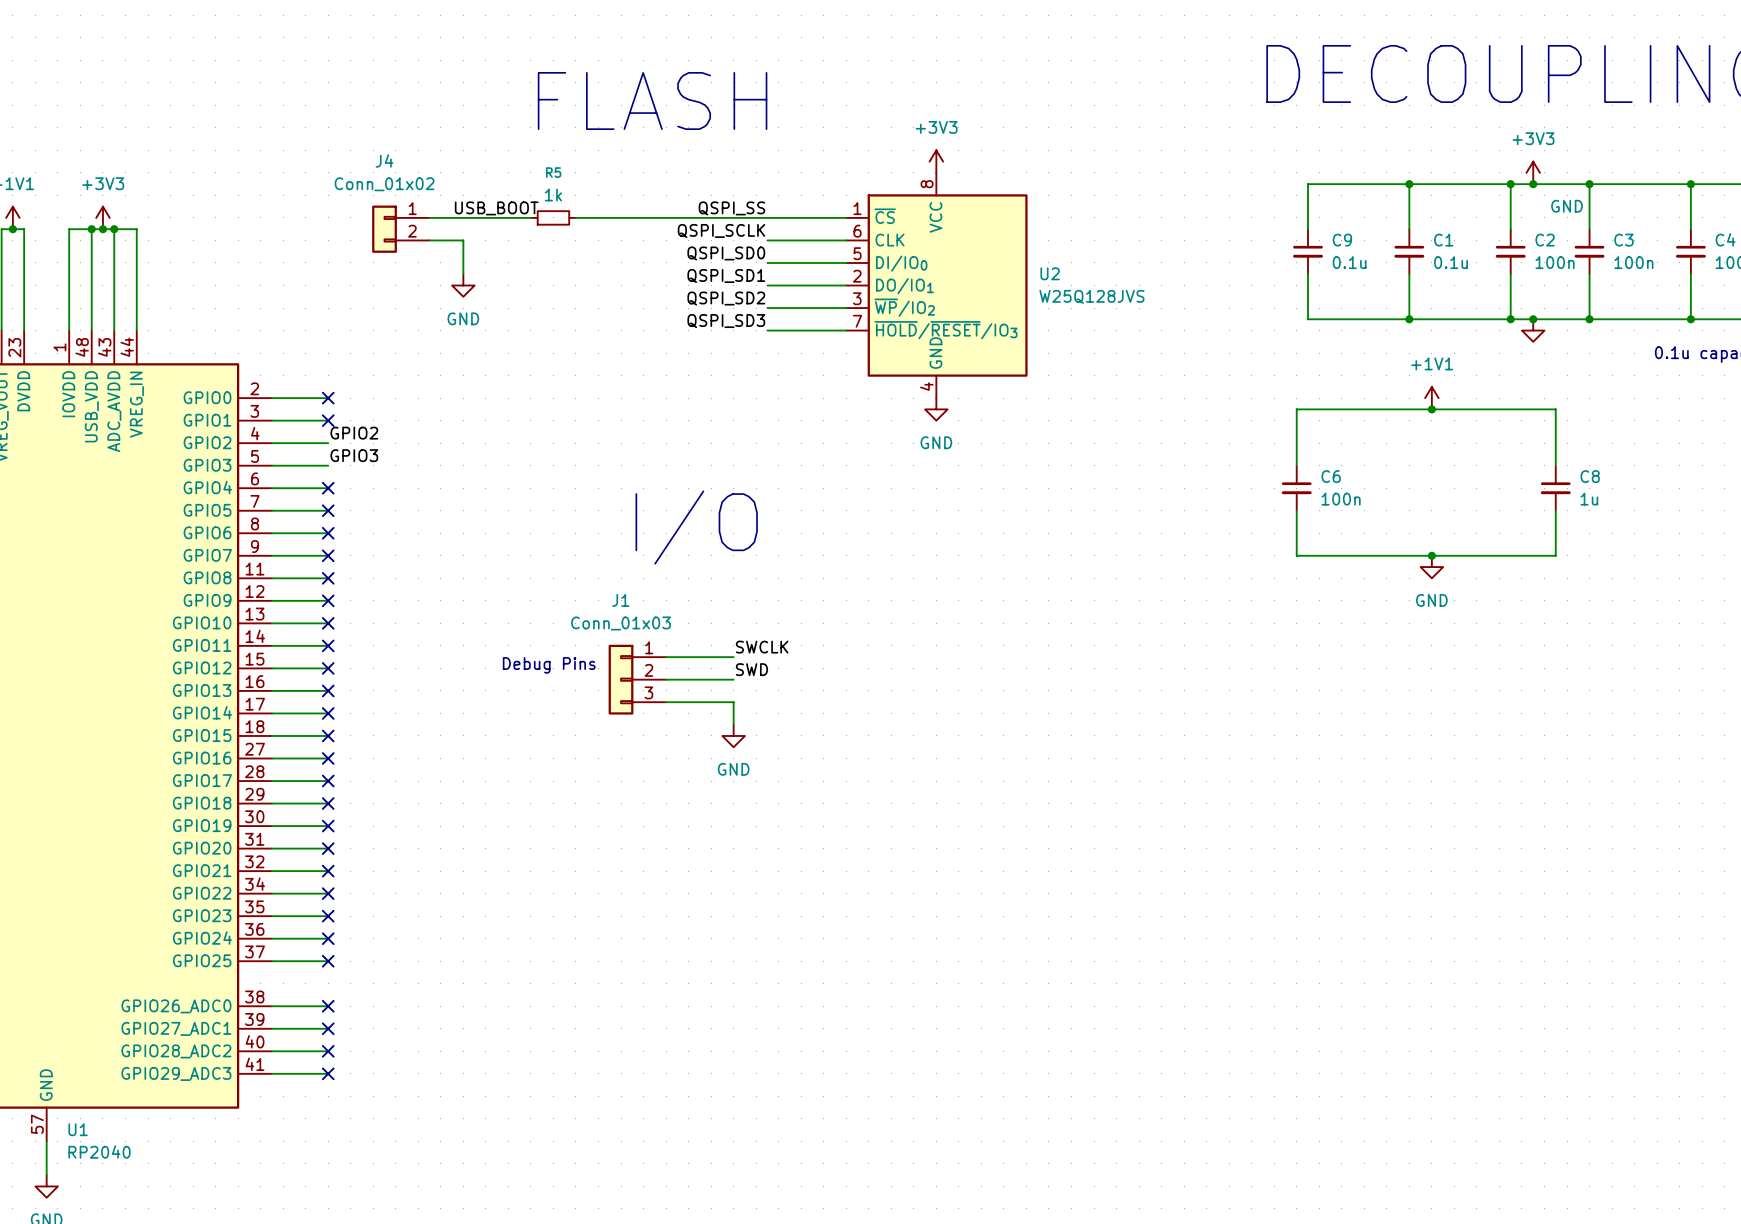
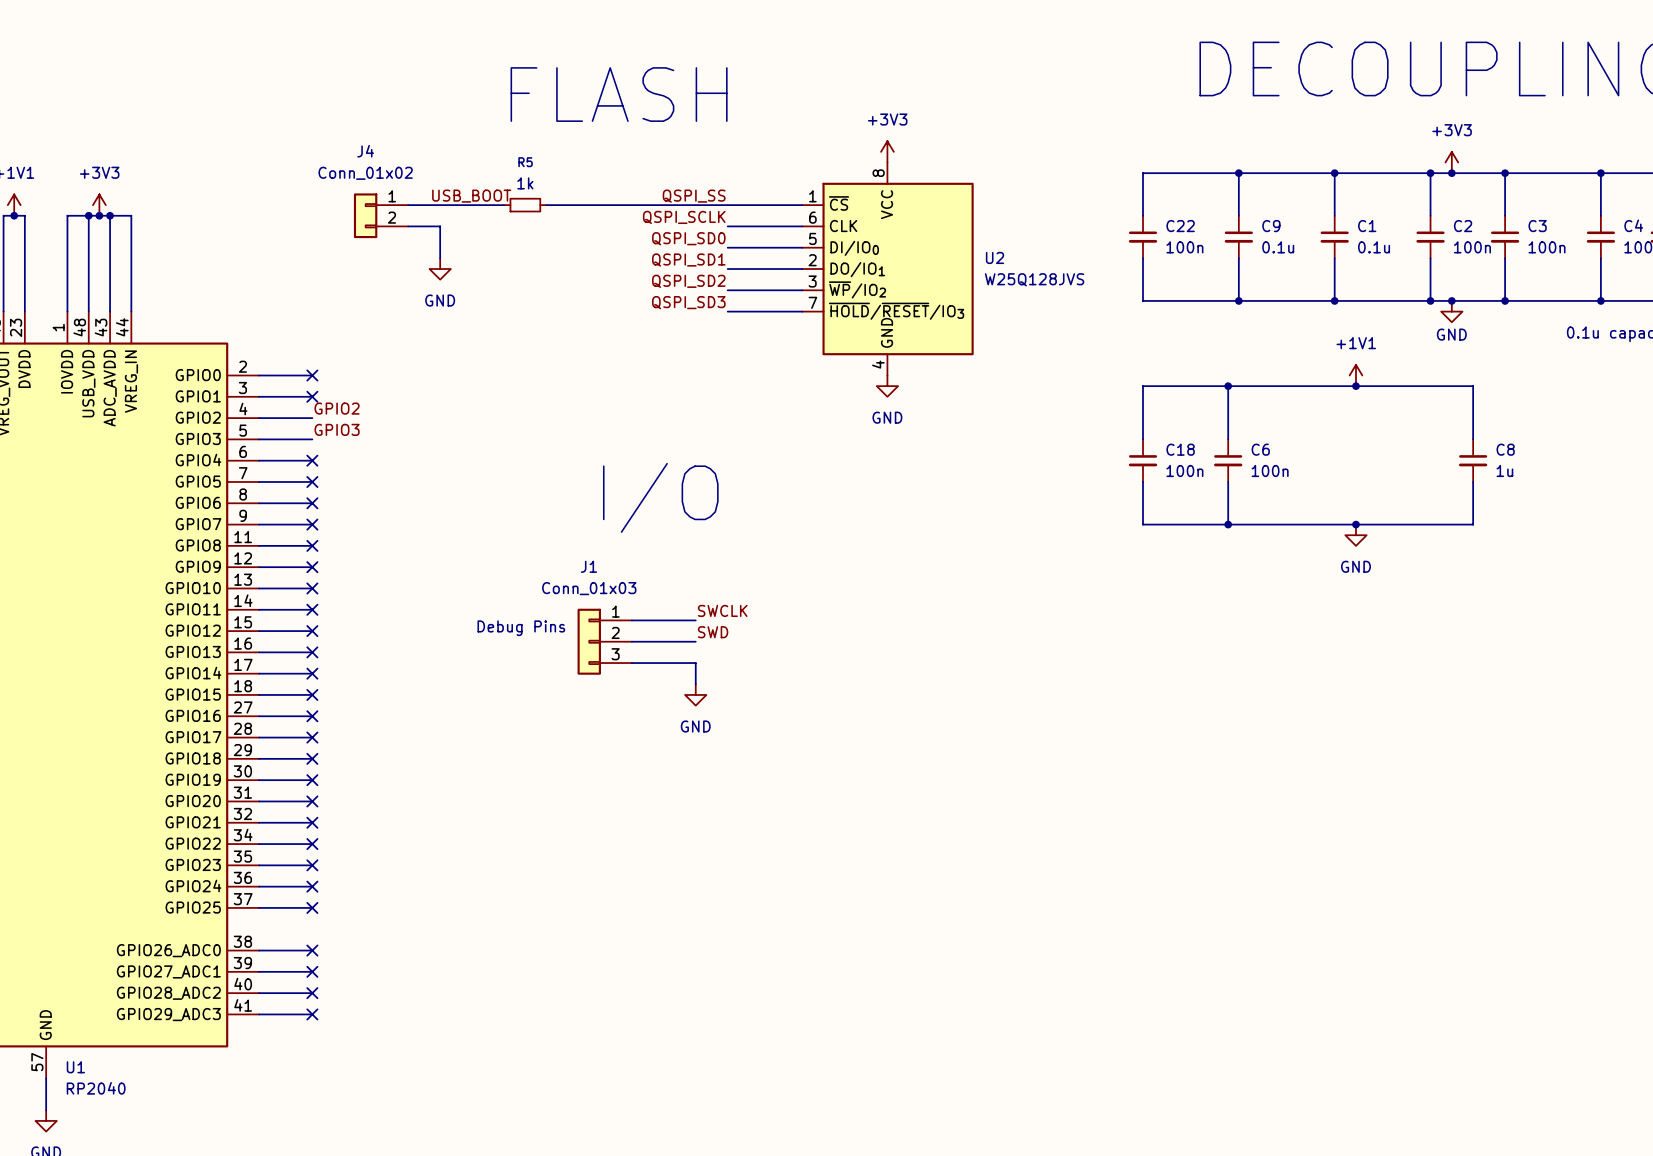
wire: none -> (1238, 173) (1143, 173) (1143, 215)
junction: none -> (1238, 173)
power symbol text position: GND (1567, 206) -> GND (1451, 334)
C22: none -> 100n (1143, 237)
wire: none -> (1143, 258) (1143, 300) (1238, 300)
junction: none -> (1238, 300)
wire: none -> (1228, 386) (1143, 386) (1143, 439)
junction: none -> (1228, 386)
C18: none -> 100n (1143, 460)
wire: none -> (1143, 481) (1143, 524) (1228, 524)
junction: none -> (1228, 524)

